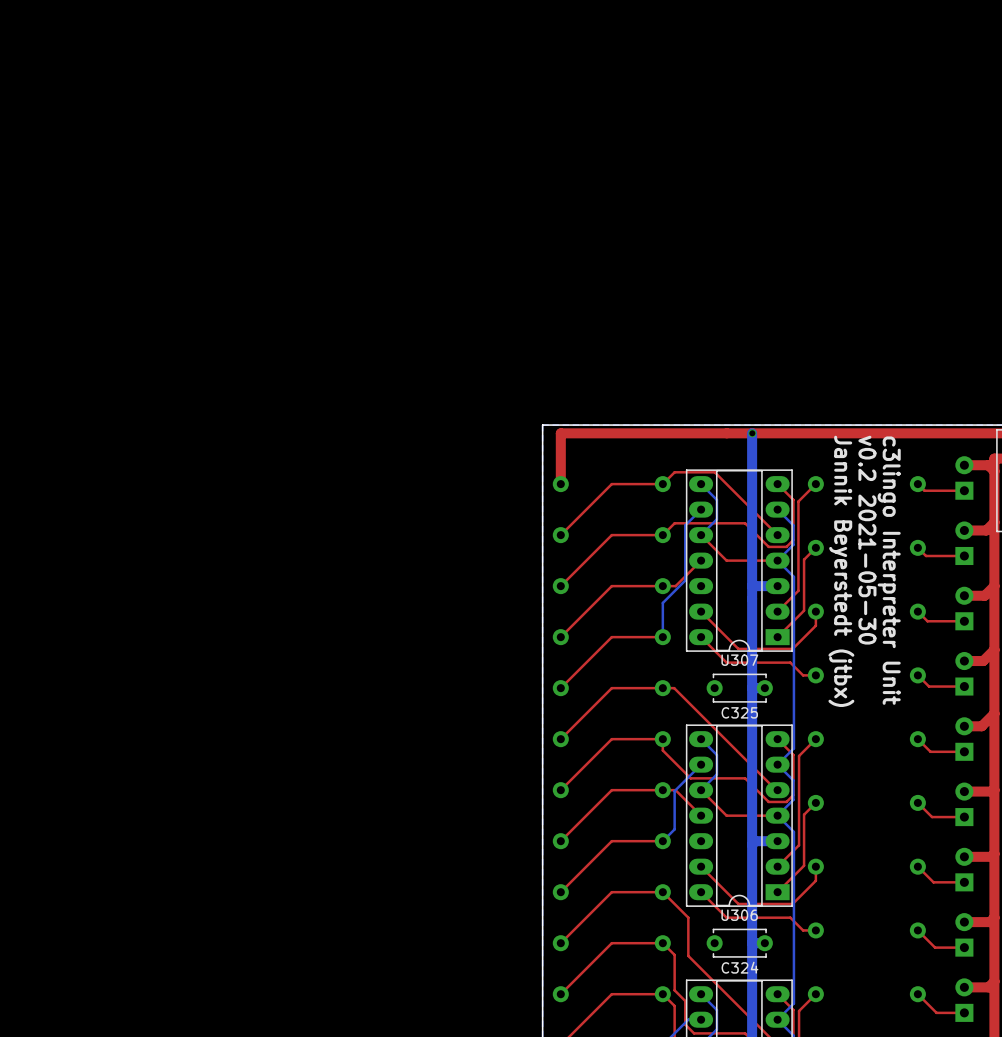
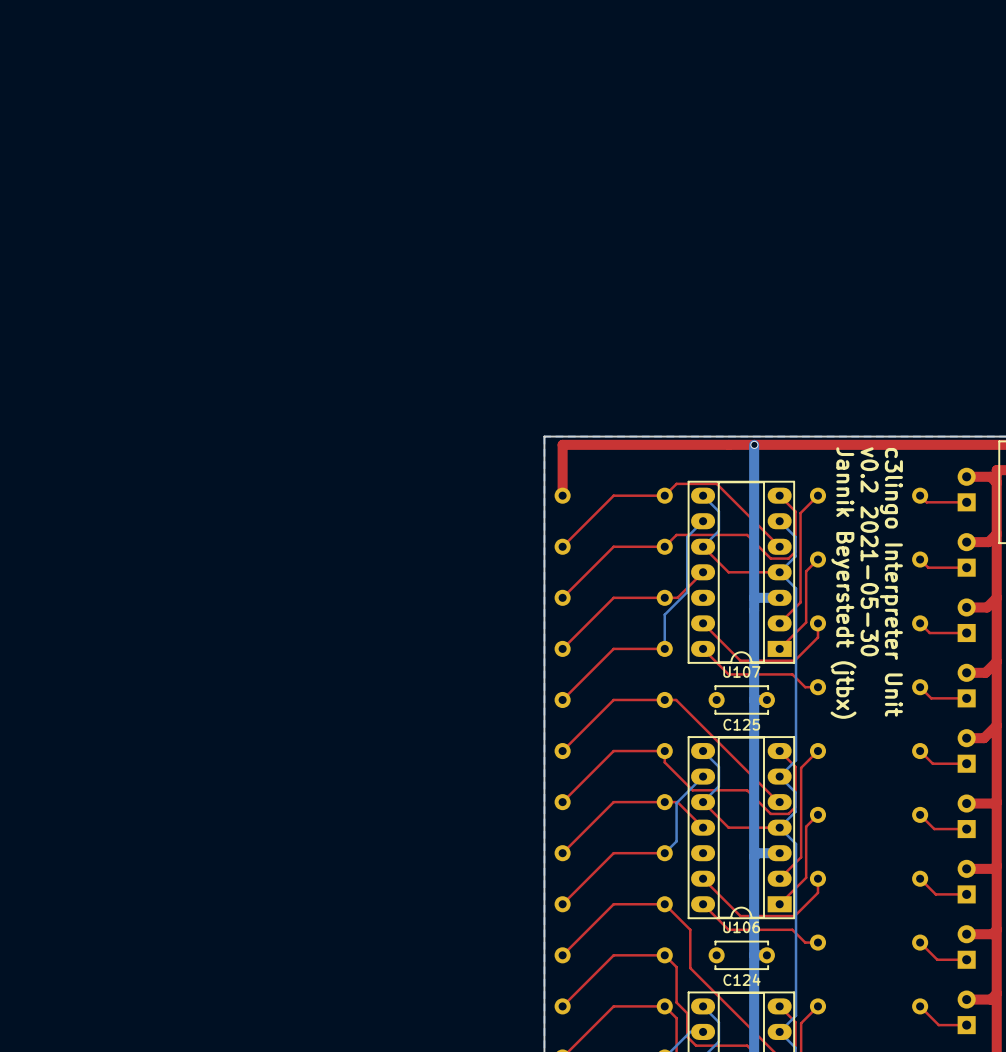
U307 name: U307 (739, 660) -> U107 (741, 671)
C325 name: C325 (739, 712) -> C125 (741, 724)
U306 name: U306 (739, 915) -> U106 (741, 927)
C324 name: C324 (740, 967) -> C124 (742, 979)

